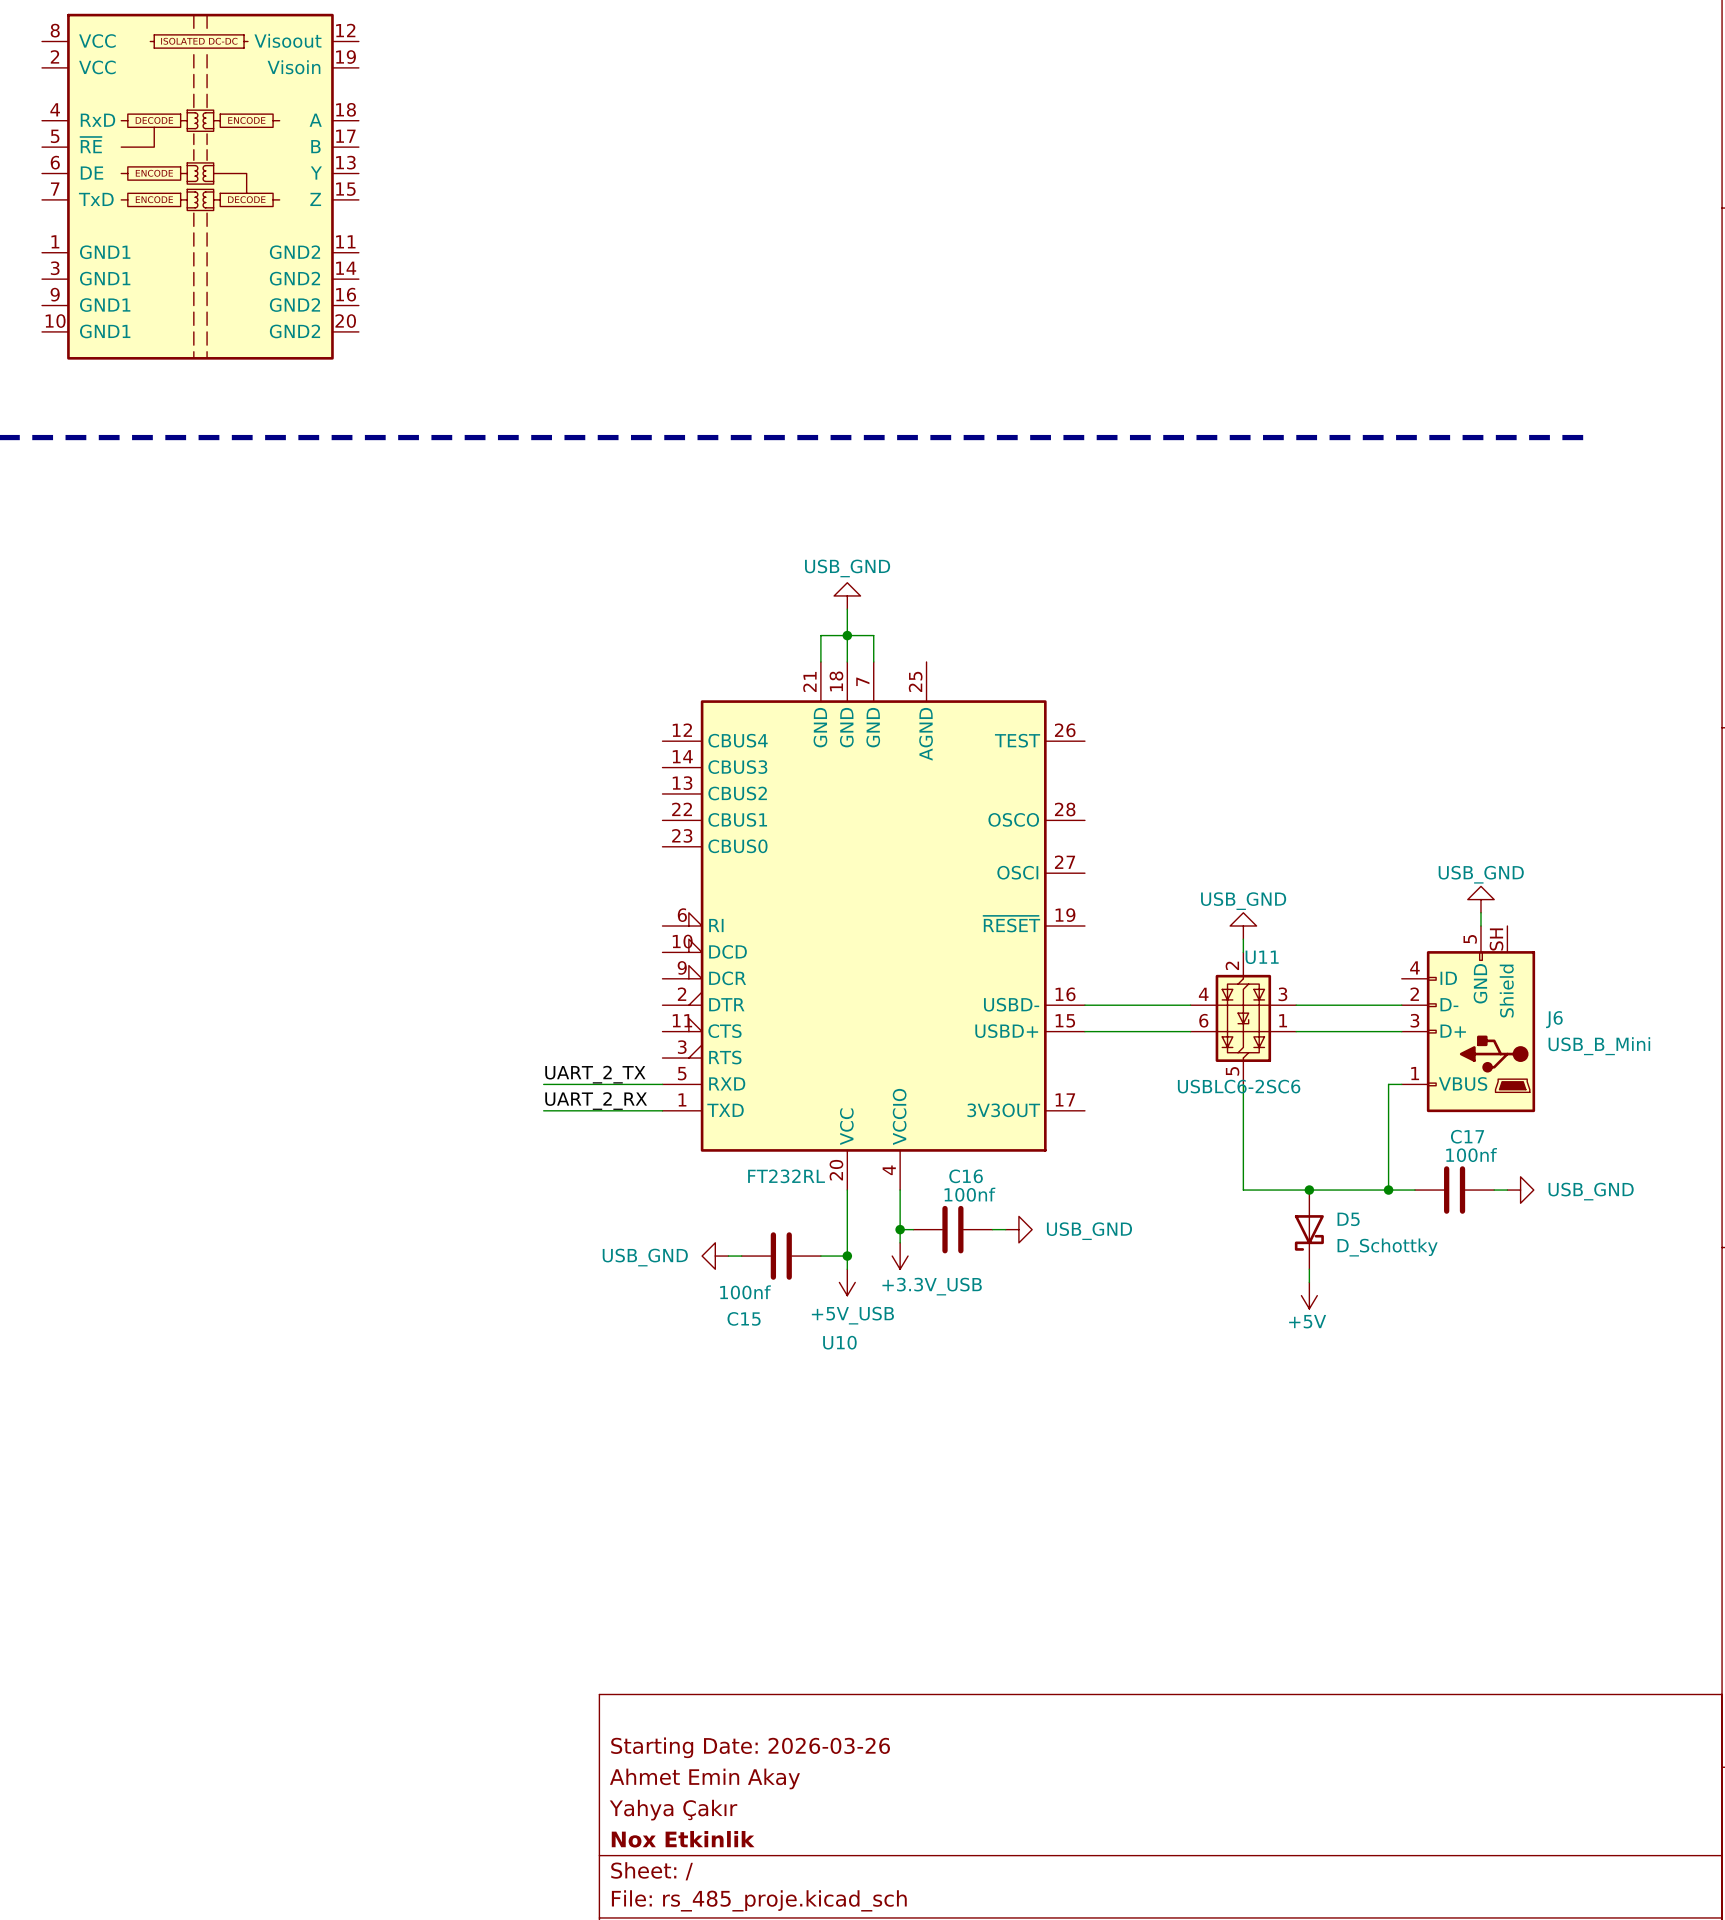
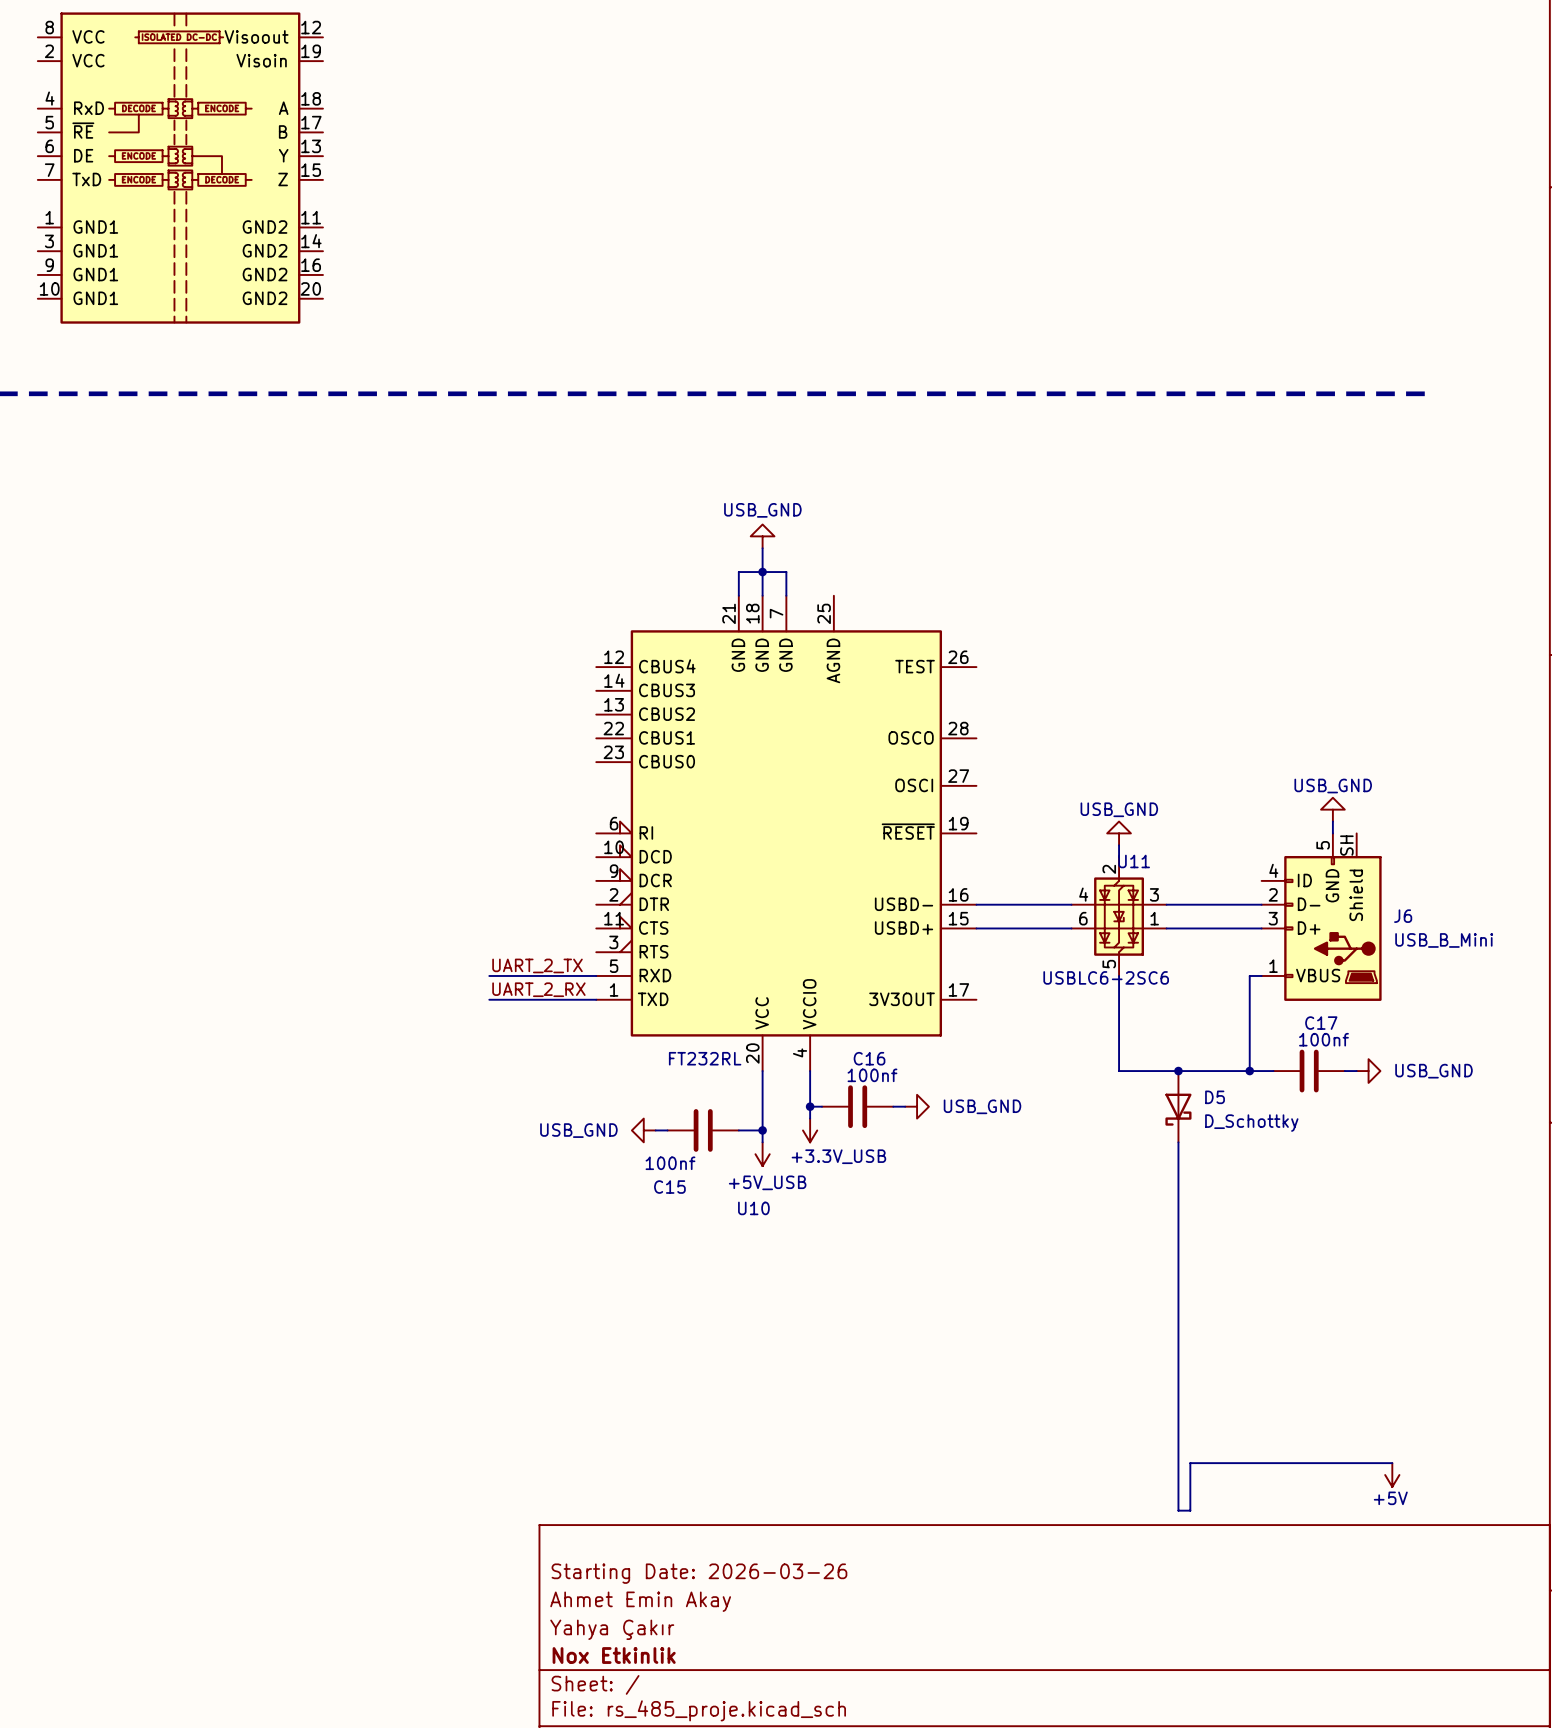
wire: none -> (1178, 1154) (1178, 1510) (1190, 1510) (1190, 1463) (1392, 1463)
power symbol: +5V (1309, 1295) -> none
power symbol: none -> +5V (1392, 1475)

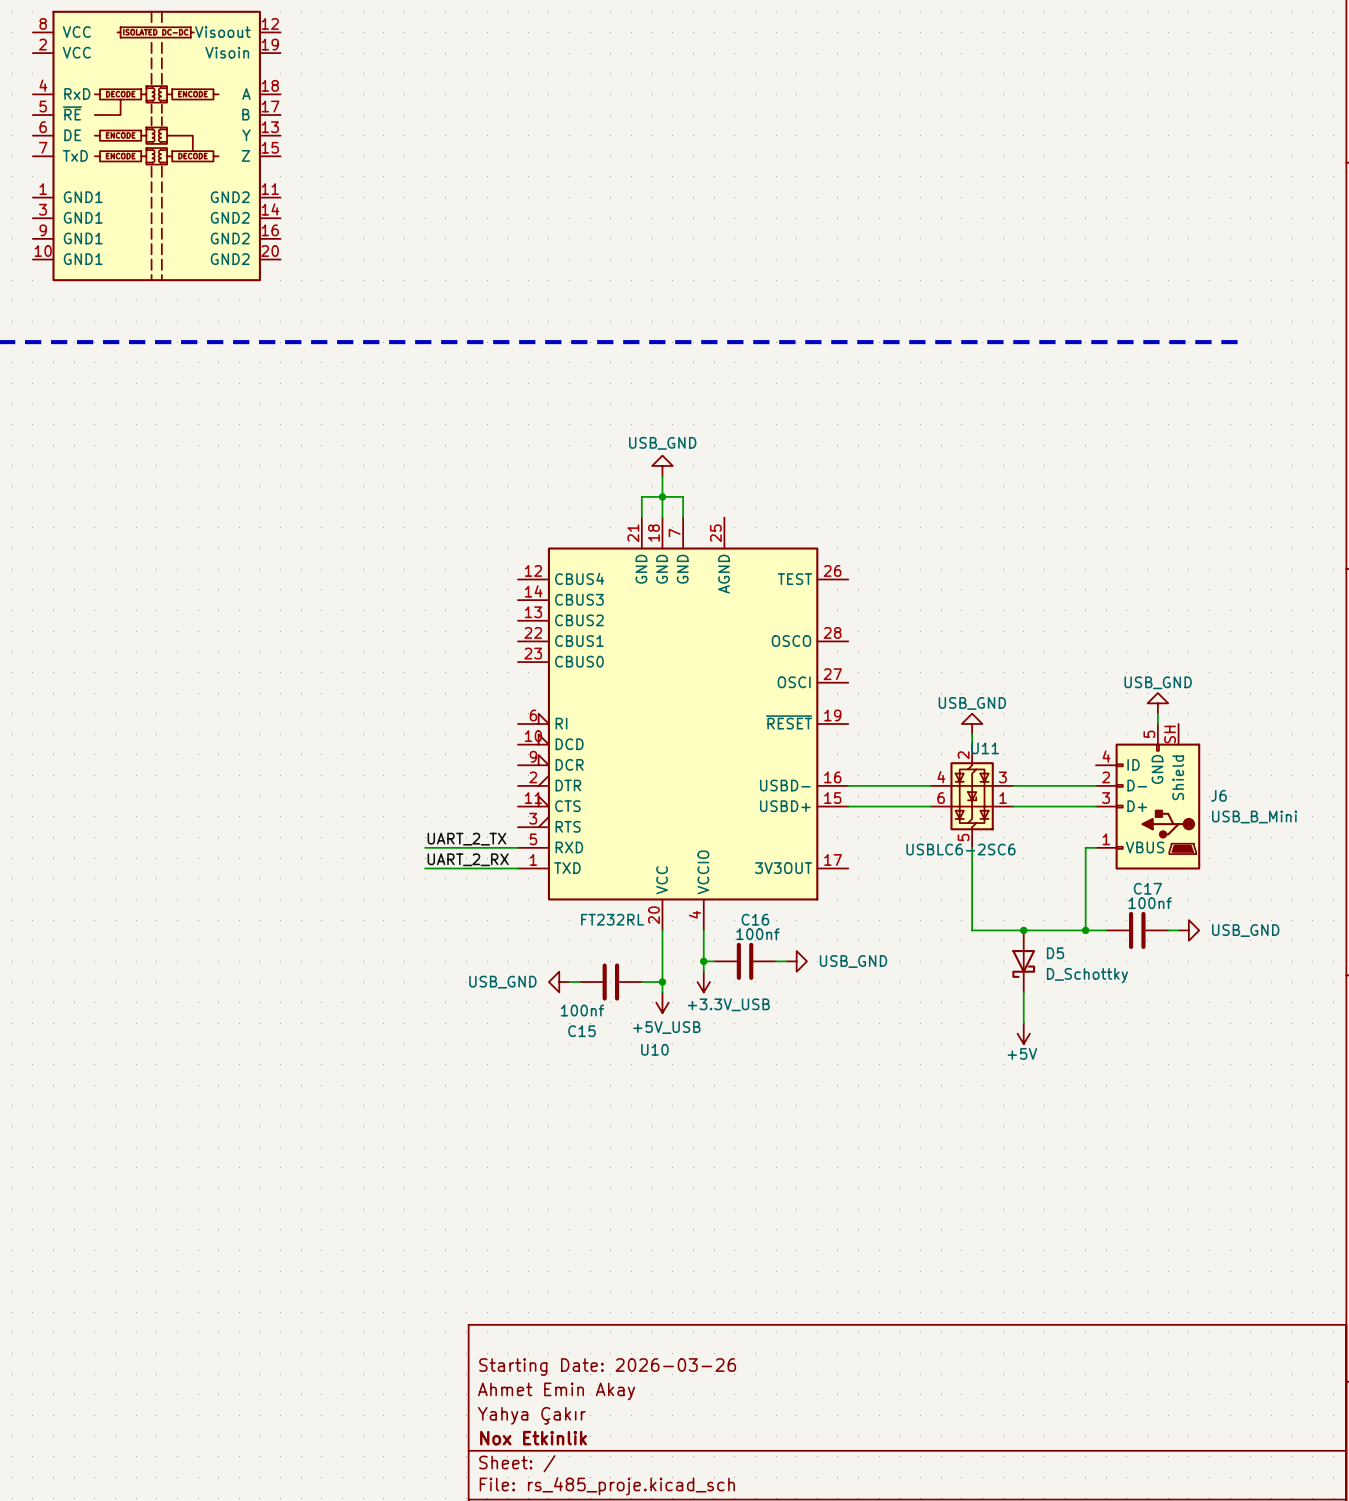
wire: (1178, 1177) (1178, 1510) (1190, 1510) (1190, 1463) (1392, 1463) -> none
power symbol: none -> +5V (1023, 1033)
power symbol: +5V (1392, 1475) -> none

